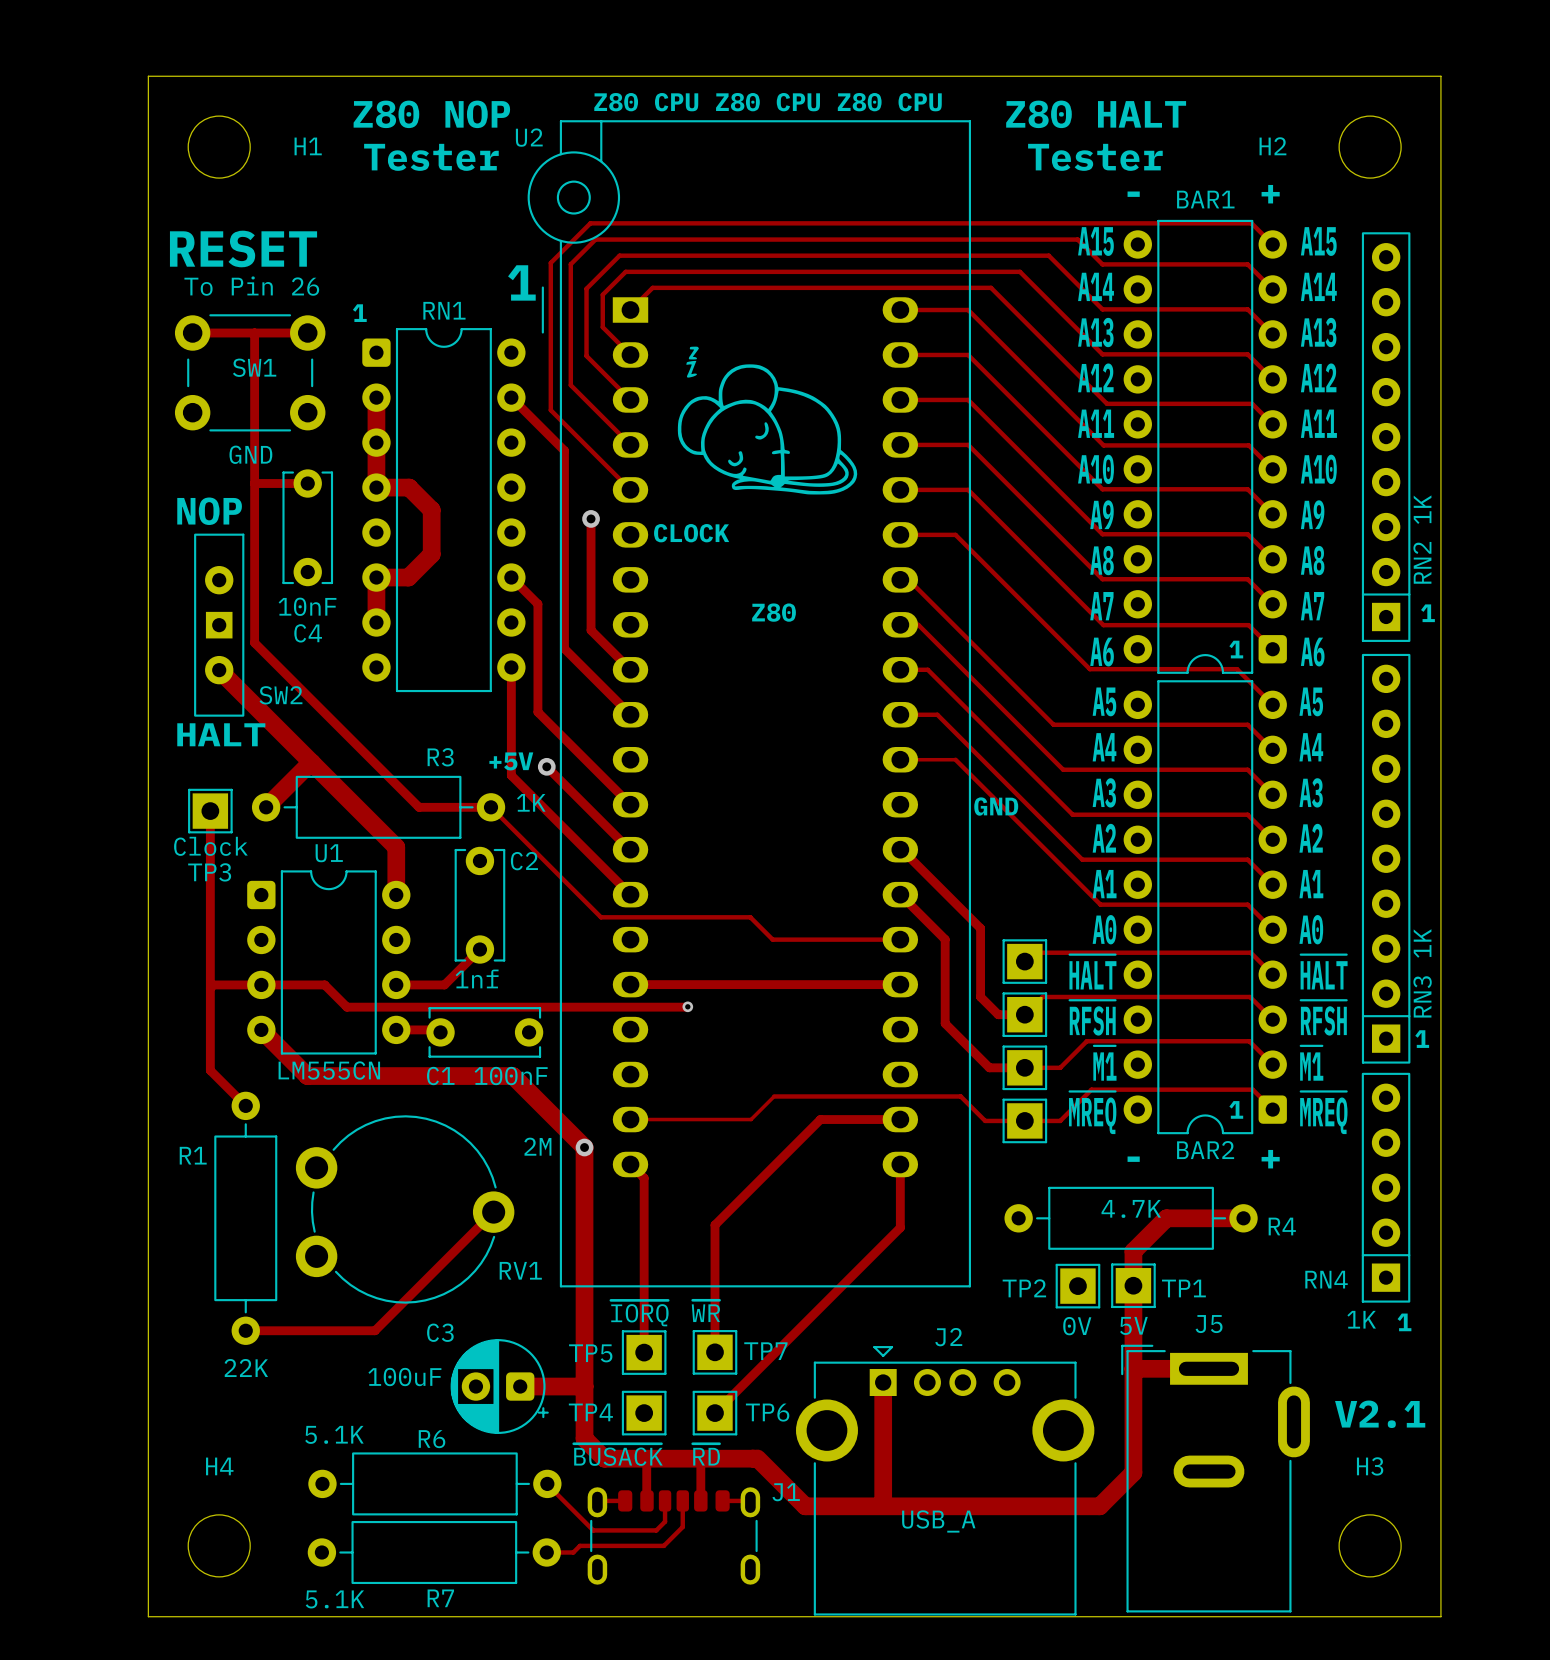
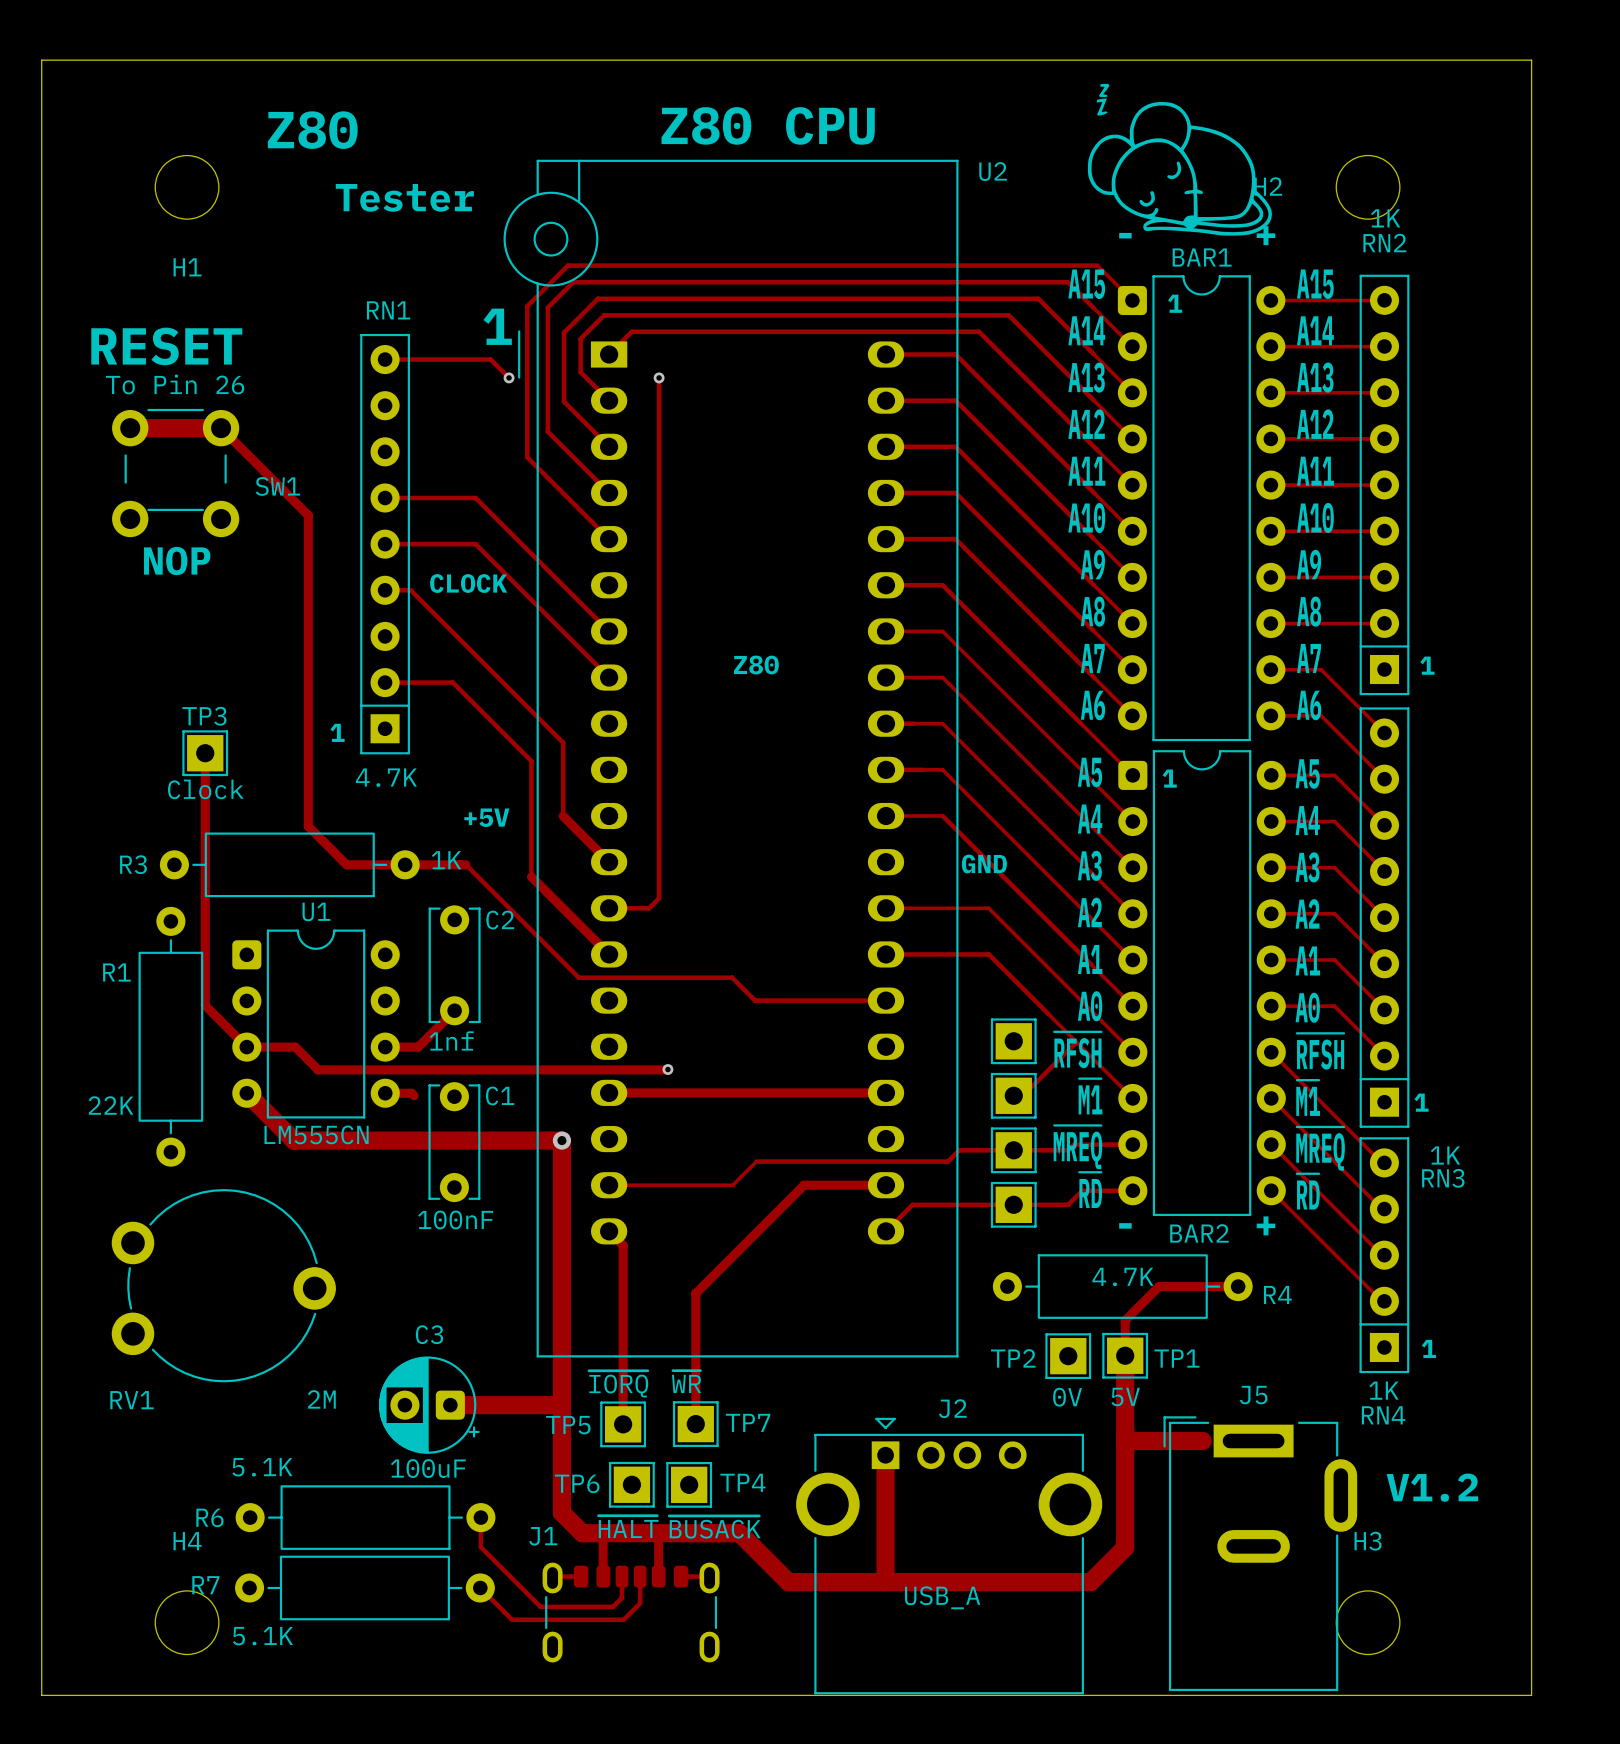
drawing: none -> [1087, 83, 1272, 236]
text: none -> Z80 CPU (768, 125)
text: none -> Z80 (312, 130)
text: Z80 CPU Z80 CPU Z80 CPU (768, 102) -> none
text: Z80 NOP (431, 114) -> none
text: Z80 HALT (1096, 114) -> none
U2 name position: U2 (529, 137) -> U2 (993, 171)
H1 name position: H1 (308, 146) -> H1 (187, 267)
text: Tester (1095, 157) -> none
track: (1106, 223) (1251, 223) (1272, 244) -> (1097, 265) (1132, 300)
text position: RESET (243, 248) -> RESET (166, 346)
track: none -> (1270, 300) (1384, 300)
text: none -> 1 (1175, 303)
track: (1102, 264) (1247, 264) (1272, 289) -> (1093, 307) (1132, 346)
text position: To Pin 26 (251, 286) -> To Pin 26 (175, 384)
track: none -> (1270, 346) (1384, 346)
track: (1102, 309) (1247, 309) (1272, 334) -> (1093, 353) (1132, 392)
text position: 1 (359, 313) -> 1 (337, 732)
SW1 footprint: [174, 314, 326, 432] -> [112, 408, 240, 538]
track: none -> (385, 359) (490, 359) (509, 377)
RN1 footprint: [362, 328, 526, 693] -> [360, 333, 410, 755]
via: none -> (509, 377)
via: none -> (659, 377)
track: (192, 333) (307, 333) -> none
track: (254, 333) (254, 642) (419, 807) -> (130, 428) (221, 428) (308, 515) (308, 826) (346, 864) (392, 864)
drawing: [677, 346, 858, 495] -> none
track: none -> (1270, 392) (1384, 392)
track: (1102, 354) (1247, 354) (1272, 379) -> (1093, 400) (1132, 438)
SW1 name position: SW1 (254, 367) -> SW1 (277, 486)
track: none -> (1270, 438) (1384, 438)
track: (376, 397) (376, 487) (409, 487) (431, 510) (431, 554) (408, 577) (376, 577) (376, 622) -> none
track: (511, 397) (564, 450) (564, 648) (630, 714) -> none
track: (1107, 403) (1252, 403) (1272, 424) -> (1098, 450) (1132, 485)
track: none -> (1270, 485) (1384, 485)
track: (1103, 445) (1248, 445) (1272, 469) -> (1094, 493) (1132, 531)
BAR1 rotation: 0° (1205, 446) -> 180° (1201, 508)
track: none -> (385, 497) (475, 497) (609, 631)
text: GND (250, 454) -> none
track: none -> (1270, 531) (1384, 531)
track: (254, 483) (307, 483) -> none
track: (1102, 489) (1247, 489) (1272, 514) -> (1093, 538) (1132, 577)
track: none -> (385, 544) (475, 544) (609, 677)
RN2 value rotation: 0° (1422, 509) -> 90° clockwise (1385, 218)
RN2 value position: 1K (1422, 509) -> 1K (1385, 218)
track: (591, 518) (591, 630) (630, 669) -> none
via: (591, 518) -> none
C4: 10nF (307, 527) -> none
track: none -> (1270, 577) (1384, 577)
text position: CLOCK (691, 533) -> CLOCK (468, 583)
track: (1102, 534) (1247, 534) (1272, 559) -> (1093, 584) (1132, 623)
RN2 name rotation: 0° (1422, 562) -> 90° clockwise (1384, 243)
RN2 name position: RN2 (1422, 562) -> RN2 (1384, 243)
track: none -> (1270, 623) (1384, 623)
track: (511, 577) (537, 604) (537, 712) (585, 759) -> (385, 590) (410, 590) (563, 742) (563, 816)
track: (908, 579) (1053, 724) (1247, 724) (1272, 749) -> (894, 631) (942, 631) (1132, 821)
track: (1102, 579) (1247, 579) (1272, 604) -> (1093, 630) (1132, 669)
track: none -> (1270, 669) (1321, 669) (1384, 733)
track: (918, 624) (1063, 769) (1247, 769) (1272, 794) -> (904, 677) (942, 677) (1132, 867)
SW2: (219, 625) -> none
track: (1103, 625) (1248, 625) (1272, 649) -> (1094, 677) (1132, 715)
text position: 1 (1236, 649) -> 1 (1169, 778)
track: none -> (1270, 715) (1321, 715) (1384, 779)
track: (511, 667) (511, 775) (554, 819) -> (385, 682) (452, 682) (531, 761) (531, 876)
track: (927, 669) (1072, 814) (1247, 814) (1272, 839) -> (914, 723) (942, 723) (1132, 913)
track: (1089, 669) (1237, 669) (1272, 704) -> (1080, 723) (1132, 775)
track: (219, 670) (396, 847) (396, 894) -> none
text position: A5 (1104, 701) -> A5 (1090, 772)
text position: A5 (1311, 701) -> A5 (1307, 774)
track: (937, 714) (1082, 859) (1247, 859) (1272, 884) -> (924, 769) (942, 769) (1132, 959)
track: none -> (1271, 775) (1334, 775) (1384, 825)
RN1 value: none -> 4.7K (386, 777)
text: HALT (221, 734) -> none
text position: A4 (1104, 747) -> A4 (1090, 819)
text position: A4 (1311, 747) -> A4 (1307, 820)
R3 name position: R3 (440, 757) -> R3 (133, 864)
track: (311, 762) (266, 807) -> none
track: none -> (1271, 821) (1334, 821) (1384, 871)
track: (546, 766) (630, 849) -> (659, 377) (659, 898) (649, 908) (609, 908)
via: (546, 766) -> none
text position: A3 (1104, 792) -> A3 (1089, 865)
text position: A3 (1311, 792) -> A3 (1307, 867)
R3 position: (378, 807) -> (289, 864)
track: none -> (1271, 867) (1334, 867) (1384, 917)
track: (210, 811) (210, 1070) (245, 1105) -> none
TP3 position: (210, 811) -> (205, 753)
text position: A2 (1104, 838) -> A2 (1089, 912)
text position: A2 (1311, 838) -> A2 (1307, 913)
track: (900, 848) (980, 928) (980, 996) (998, 1014) (1024, 1014) (1042, 996) (1250, 996) (1272, 1019) -> none
track: none -> (886, 908) (988, 908) (1132, 1052)
track: none -> (1271, 913) (1334, 913) (1384, 963)
TP3 name position: TP3 (209, 872) -> TP3 (204, 716)
text position: A1 (1104, 884) -> A1 (1090, 959)
text position: A1 (1311, 884) -> A1 (1307, 960)
track: (900, 894) (945, 939) (945, 1023) (989, 1067) (1060, 1067) (1086, 1041) (1249, 1041) (1272, 1064) -> none
track: none -> (899, 954) (886, 954) (988, 954) (1132, 1098)
track: none -> (1271, 959) (1334, 959) (1384, 1009)
track: (1100, 904) (1247, 904) (1272, 929) -> (1091, 964) (1132, 1006)
BAR2 rotation: 0° (1205, 907) -> 180° (1202, 983)
text position: A0 (1104, 929) -> A0 (1090, 1006)
text position: A0 (1311, 929) -> A0 (1307, 1007)
RN3 value rotation: 0° (1422, 943) -> 90° clockwise (1445, 1155)
RN3 value position: 1K (1422, 943) -> 1K (1445, 1155)
track: none -> (1271, 1006) (1334, 1006) (1384, 1056)
track: (1024, 961) (1033, 952) (1250, 952) (1272, 974) -> none
part: (1024, 961) -> none
U1 position: (328, 962) -> (316, 1024)
text: ~{HALT} (1092, 972) -> none
text: ~{HALT} (1324, 972) -> none
part: none -> (1013, 1041)
track: none -> (1076, 1042) (1022, 1095)
track: (277, 984) (213, 984) (210, 988) -> (246, 1047) (205, 1005) (205, 753)
track: (630, 984) (900, 984) -> (609, 1092) (886, 1092)
track: none -> (1271, 1052) (1381, 1162)
RN3 name rotation: 0° (1422, 996) -> 90° clockwise (1443, 1178)
RN3 name position: RN3 (1422, 996) -> RN3 (1443, 1178)
part: (1024, 1014) -> none
text position: ~{RFSH} (1092, 1017) -> ~{RFSH} (1077, 1049)
text position: ~{RFSH} (1323, 1017) -> ~{RFSH} (1320, 1051)
track: (261, 1029) (307, 1076) (323, 1076) -> (246, 1093) (294, 1140)
C1 rotation: 0° (484, 1032) -> 90° clockwise (454, 1142)
part: none -> (1013, 1095)
track: none -> (1271, 1098) (1381, 1209)
text position: ~{M1} (1104, 1063) -> ~{M1} (1090, 1096)
text position: ~{M1} (1311, 1063) -> ~{M1} (1308, 1098)
part: (1024, 1067) -> none
C1 name position: C1 (440, 1076) -> C1 (500, 1095)
C1 value position: 100nF (511, 1076) -> 100nF (455, 1219)
track: (513, 1076) (584, 1147) -> (488, 1140) (561, 1140) (561, 1213)
track: none -> (1129, 1141) (1132, 1144) (1073, 1144) (1068, 1150) (1013, 1150)
track: none -> (1271, 1144) (1381, 1255)
part: none -> (1013, 1150)
track: (960, 1096) (985, 1120) (1060, 1120) (1091, 1089) (1252, 1089) (1272, 1109) -> (948, 1161) (959, 1150) (1004, 1150)
text: 1 (1236, 1109) -> none
text position: ~{MREQ} (1092, 1112) -> ~{MREQ} (1077, 1147)
text position: ~{MREQ} (1323, 1112) -> ~{MREQ} (1320, 1148)
part: (1024, 1120) -> none
text: none -> ~{RD} (1090, 1190)
track: none -> (1271, 1190) (1381, 1301)
text: none -> ~{RD} (1308, 1191)
part: none -> (1013, 1204)
RV1 value position: 2M (537, 1146) -> 2M (321, 1399)
via position: (584, 1147) -> (561, 1140)
track: (900, 1164) (900, 1227) (714, 1413) -> (886, 1231) (912, 1204) (1068, 1204) (1082, 1190) (1132, 1190)
RV1 position: (405, 1209) -> (223, 1285)
track: (493, 1212) (375, 1330) (245, 1330) -> none
R1 position: (245, 1218) -> (170, 1036)
track width: thick (1243, 1218) (1166, 1218) (1133, 1251) (1133, 1285) -> thin (1238, 1286) (1159, 1286) (1125, 1320) (1125, 1355)
RV1 name position: RV1 (520, 1270) -> RV1 (131, 1400)
RN4 name position: RN4 (1326, 1279) -> RN4 (1383, 1415)
RN4 value position: 1K (1361, 1319) -> 1K (1383, 1390)
text position: 1 (1404, 1322) -> 1 (1428, 1348)
C3 name position: C3 (440, 1332) -> C3 (429, 1334)
track: none -> (450, 1405) (561, 1405)
R1 value position: 22K (246, 1368) -> 22K (111, 1105)
C3 value position: 100uF (404, 1377) -> 100uF (428, 1468)
track: (883, 1382) (883, 1504) -> none
track: none -> (885, 1455) (885, 1580) (883, 1582)
C3 position: (499, 1386) -> (429, 1405)
track: (520, 1386) (584, 1386) -> none
TP4 name position: TP4 (590, 1412) -> TP4 (742, 1482)
TP6 name position: TP6 (767, 1412) -> TP6 (577, 1483)
TP4 position: (644, 1413) -> (689, 1484)
TP6 position: (714, 1413) -> (631, 1484)
text: V2.1 (1380, 1414) -> none
text: none -> V1.2 (1432, 1487)
R6 name position: R6 (432, 1439) -> R6 (209, 1517)
TP4 value position: ~{BUSACK} (618, 1454) -> ~{BUSACK} (714, 1527)
TP6 value: ~{RD} (706, 1454) -> ~{HALT} (628, 1526)
track: none -> (658, 1533) (658, 1576)
track: (700, 1458) (700, 1500) -> (703, 1576) (681, 1576)
track: (646, 1459) (646, 1490) -> (603, 1533) (603, 1565)
J5 position: (1215, 1478) -> (1260, 1553)
J2 position: (945, 1480) -> (949, 1556)
R6 position: (434, 1483) -> (365, 1517)
track: (547, 1483) (593, 1530) -> (480, 1517) (480, 1547) (540, 1606) (570, 1606)
J1 name position: J1 (786, 1492) -> J1 (543, 1536)
track: (603, 1500) (625, 1500) -> (554, 1576) (576, 1576)
track: none -> (640, 1576) (640, 1603) (623, 1619) (512, 1619) (480, 1587)
track: (665, 1500) (665, 1521) (656, 1530) (634, 1530) -> (621, 1576) (621, 1597) (613, 1606)
track: (682, 1500) (682, 1527) (663, 1545) (579, 1545) (573, 1552) (546, 1552) -> none
track: (726, 1500) (748, 1500) -> none
J1 position: (673, 1535) -> (631, 1612)
R7 position: (434, 1552) -> (364, 1587)
R7 name position: R7 (440, 1598) -> R7 (205, 1585)
board edge: (148, 1616) (148, 76) (1440, 76) (1440, 1616) -> (114, 1695) (41, 1695) (41, 60) (1531, 60) (1531, 1695) (1440, 1695)

